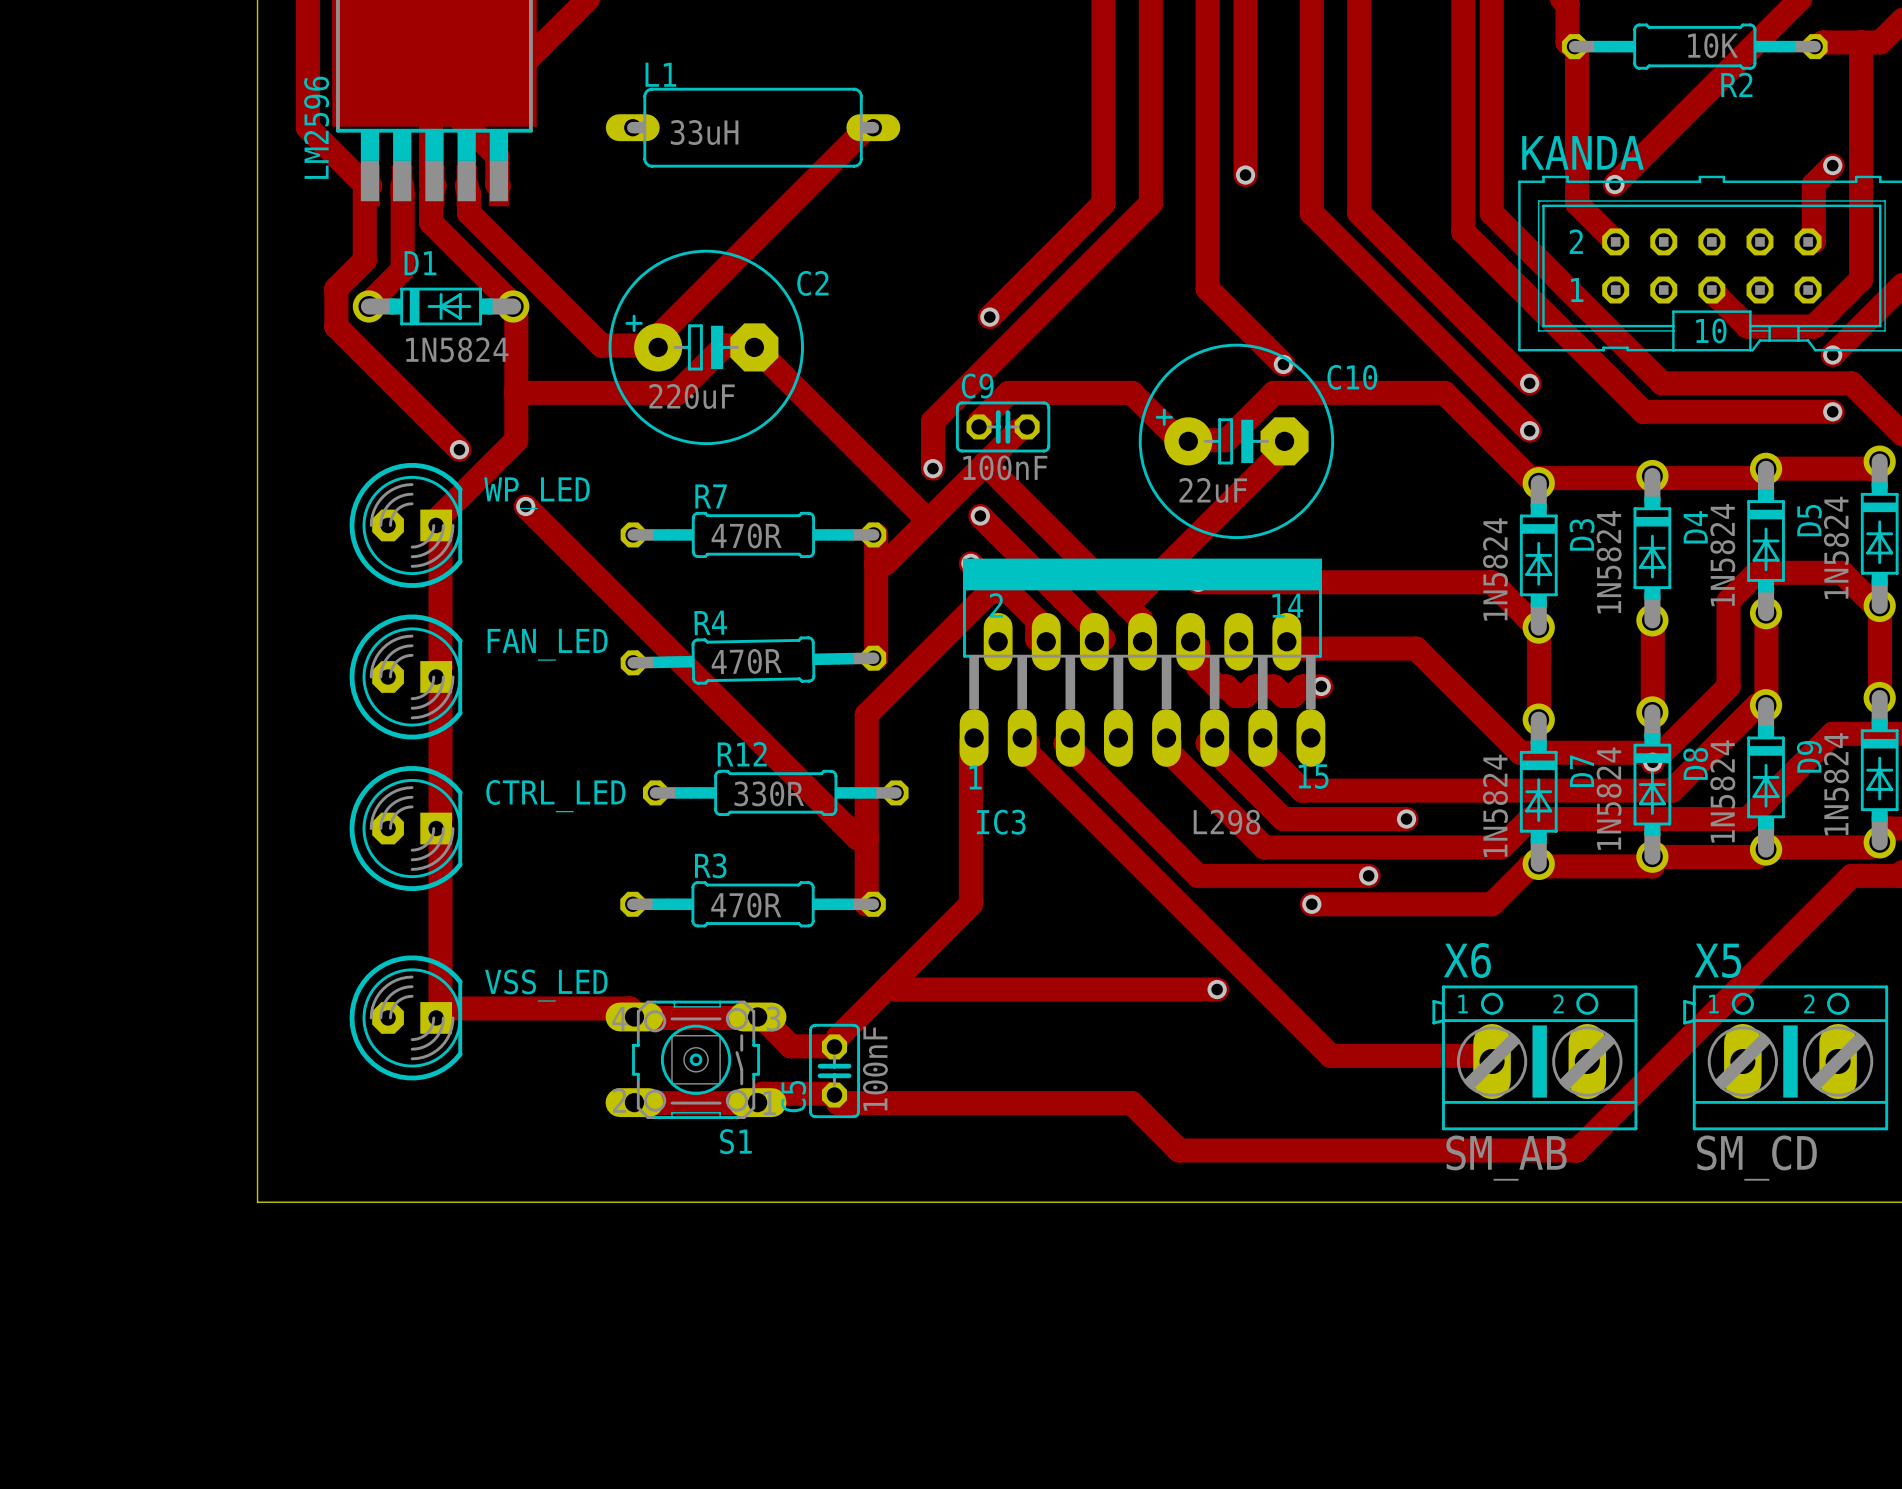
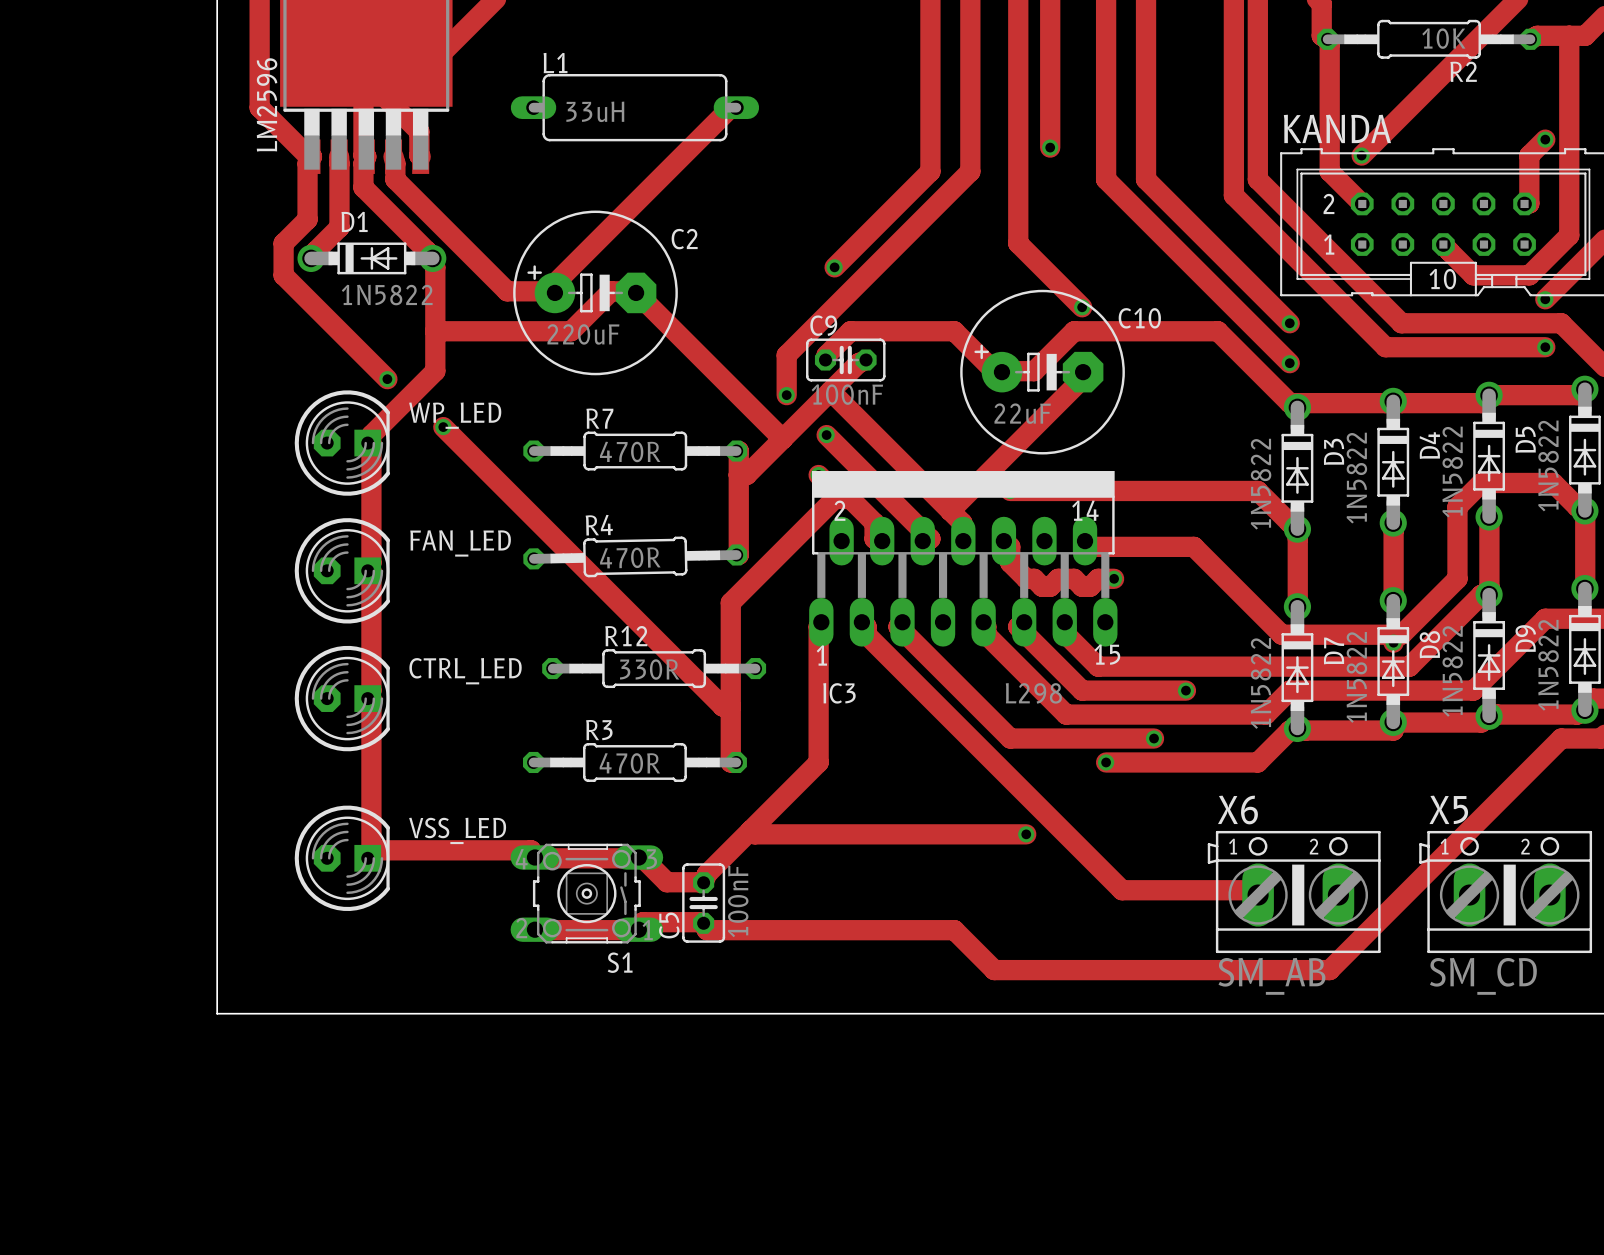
D1 value: 1N5824 (457, 349) -> 1N5822 (387, 295)
part value: 1N5824 (1836, 547) -> 1N5822 (1548, 465)
D5 value: 1N5824 (1722, 555) -> 1N5822 (1452, 472)
D4 value: 1N5824 (1609, 562) -> 1N5822 (1356, 478)
D3 value: 1N5824 (1495, 569) -> 1N5822 (1261, 484)
part value: 1N5824 (1836, 784) -> 1N5822 (1548, 665)
D9 value: 1N5824 (1722, 791) -> 1N5822 (1452, 671)
D8 value: 1N5824 (1609, 798) -> 1N5822 (1356, 677)
D7 value: 1N5824 (1495, 805) -> 1N5822 (1261, 683)

